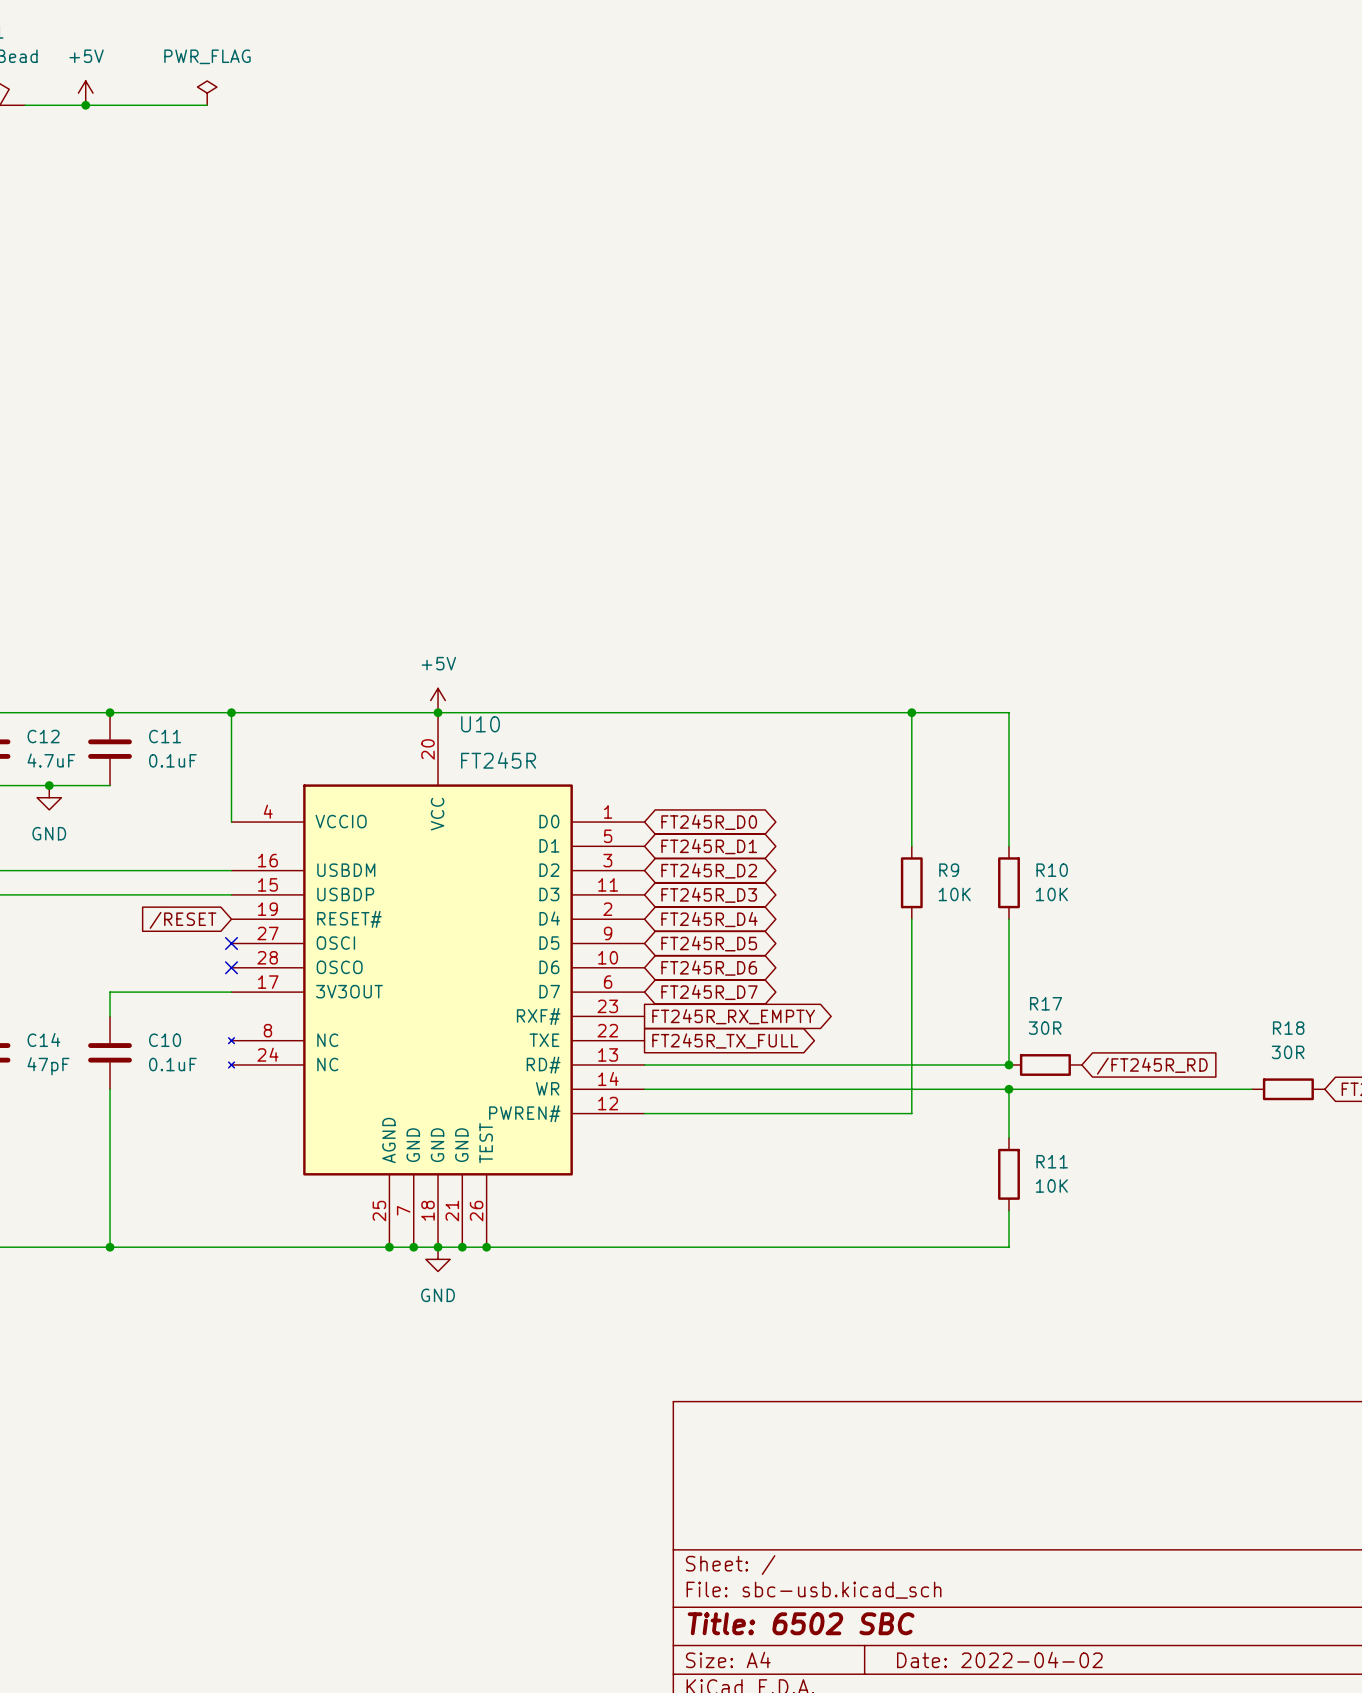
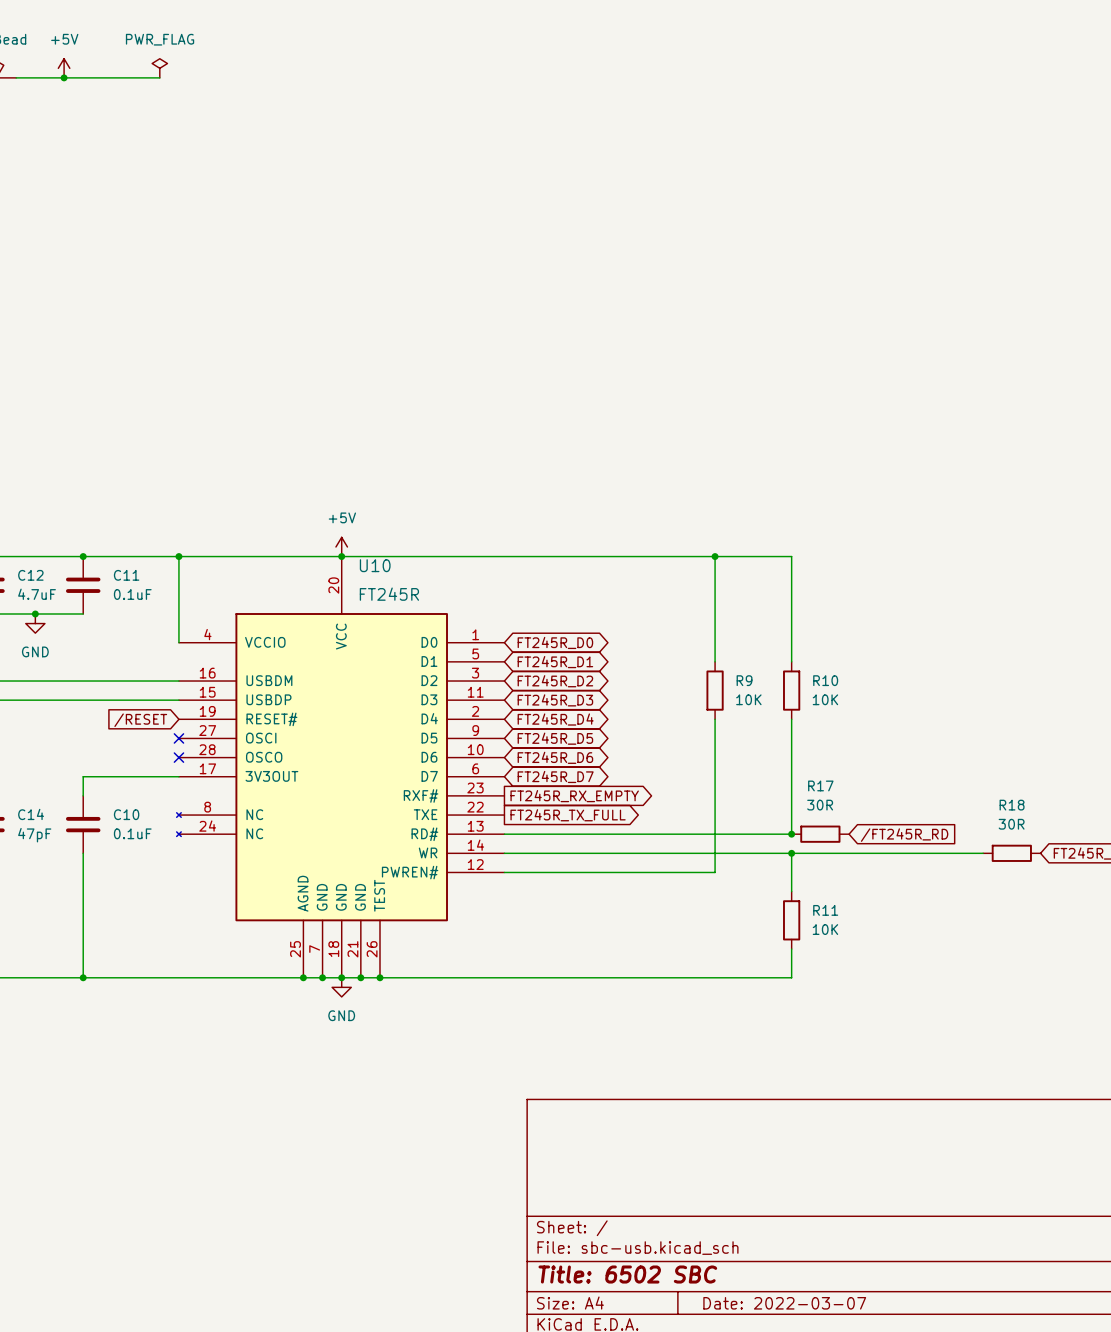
title block: Date: 2022-04-02 (999, 1659) -> Date: 2022-03-07 (784, 1303)

